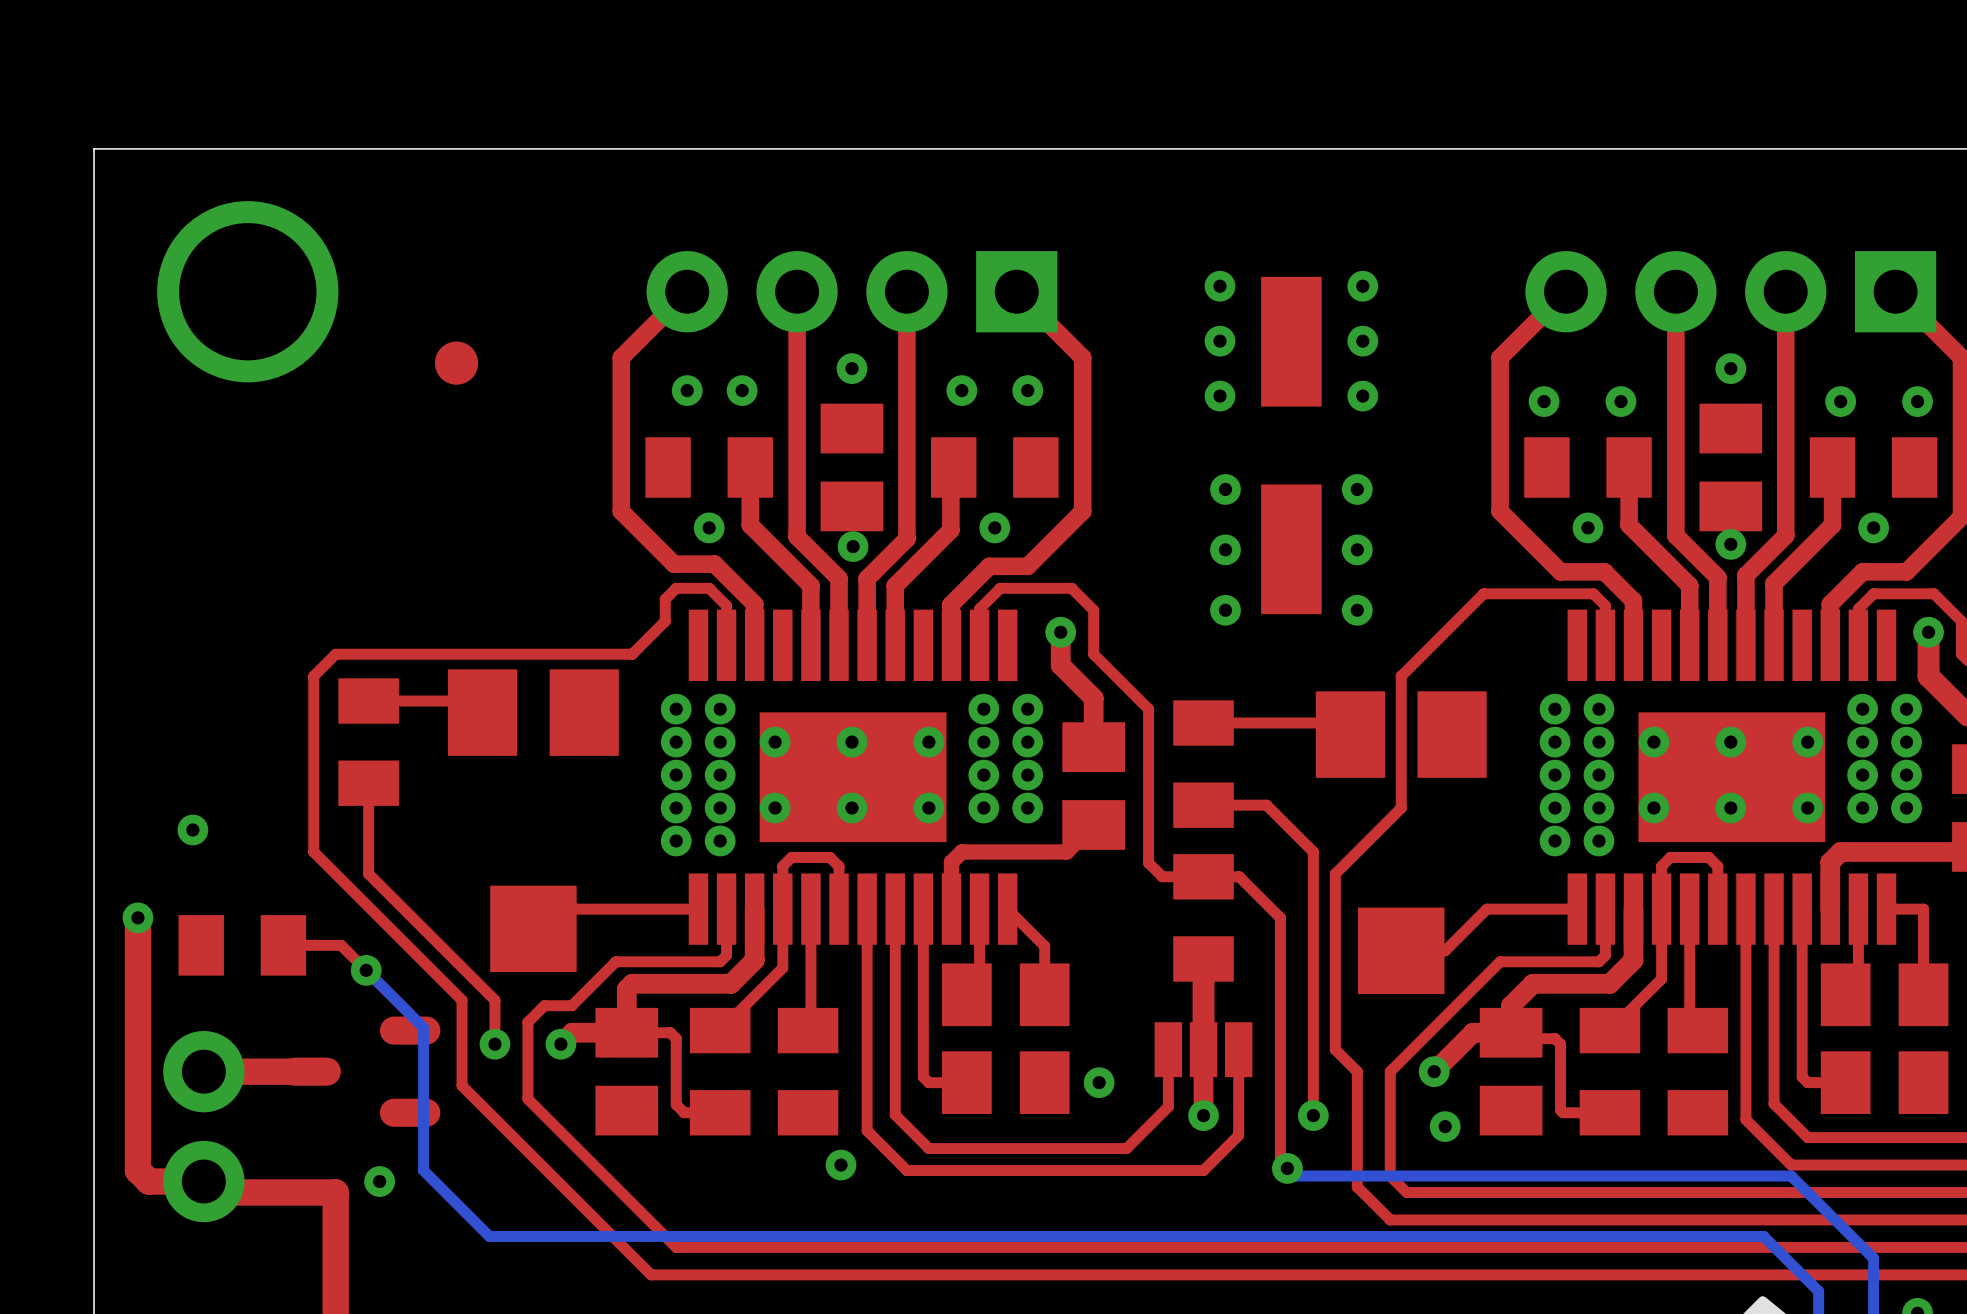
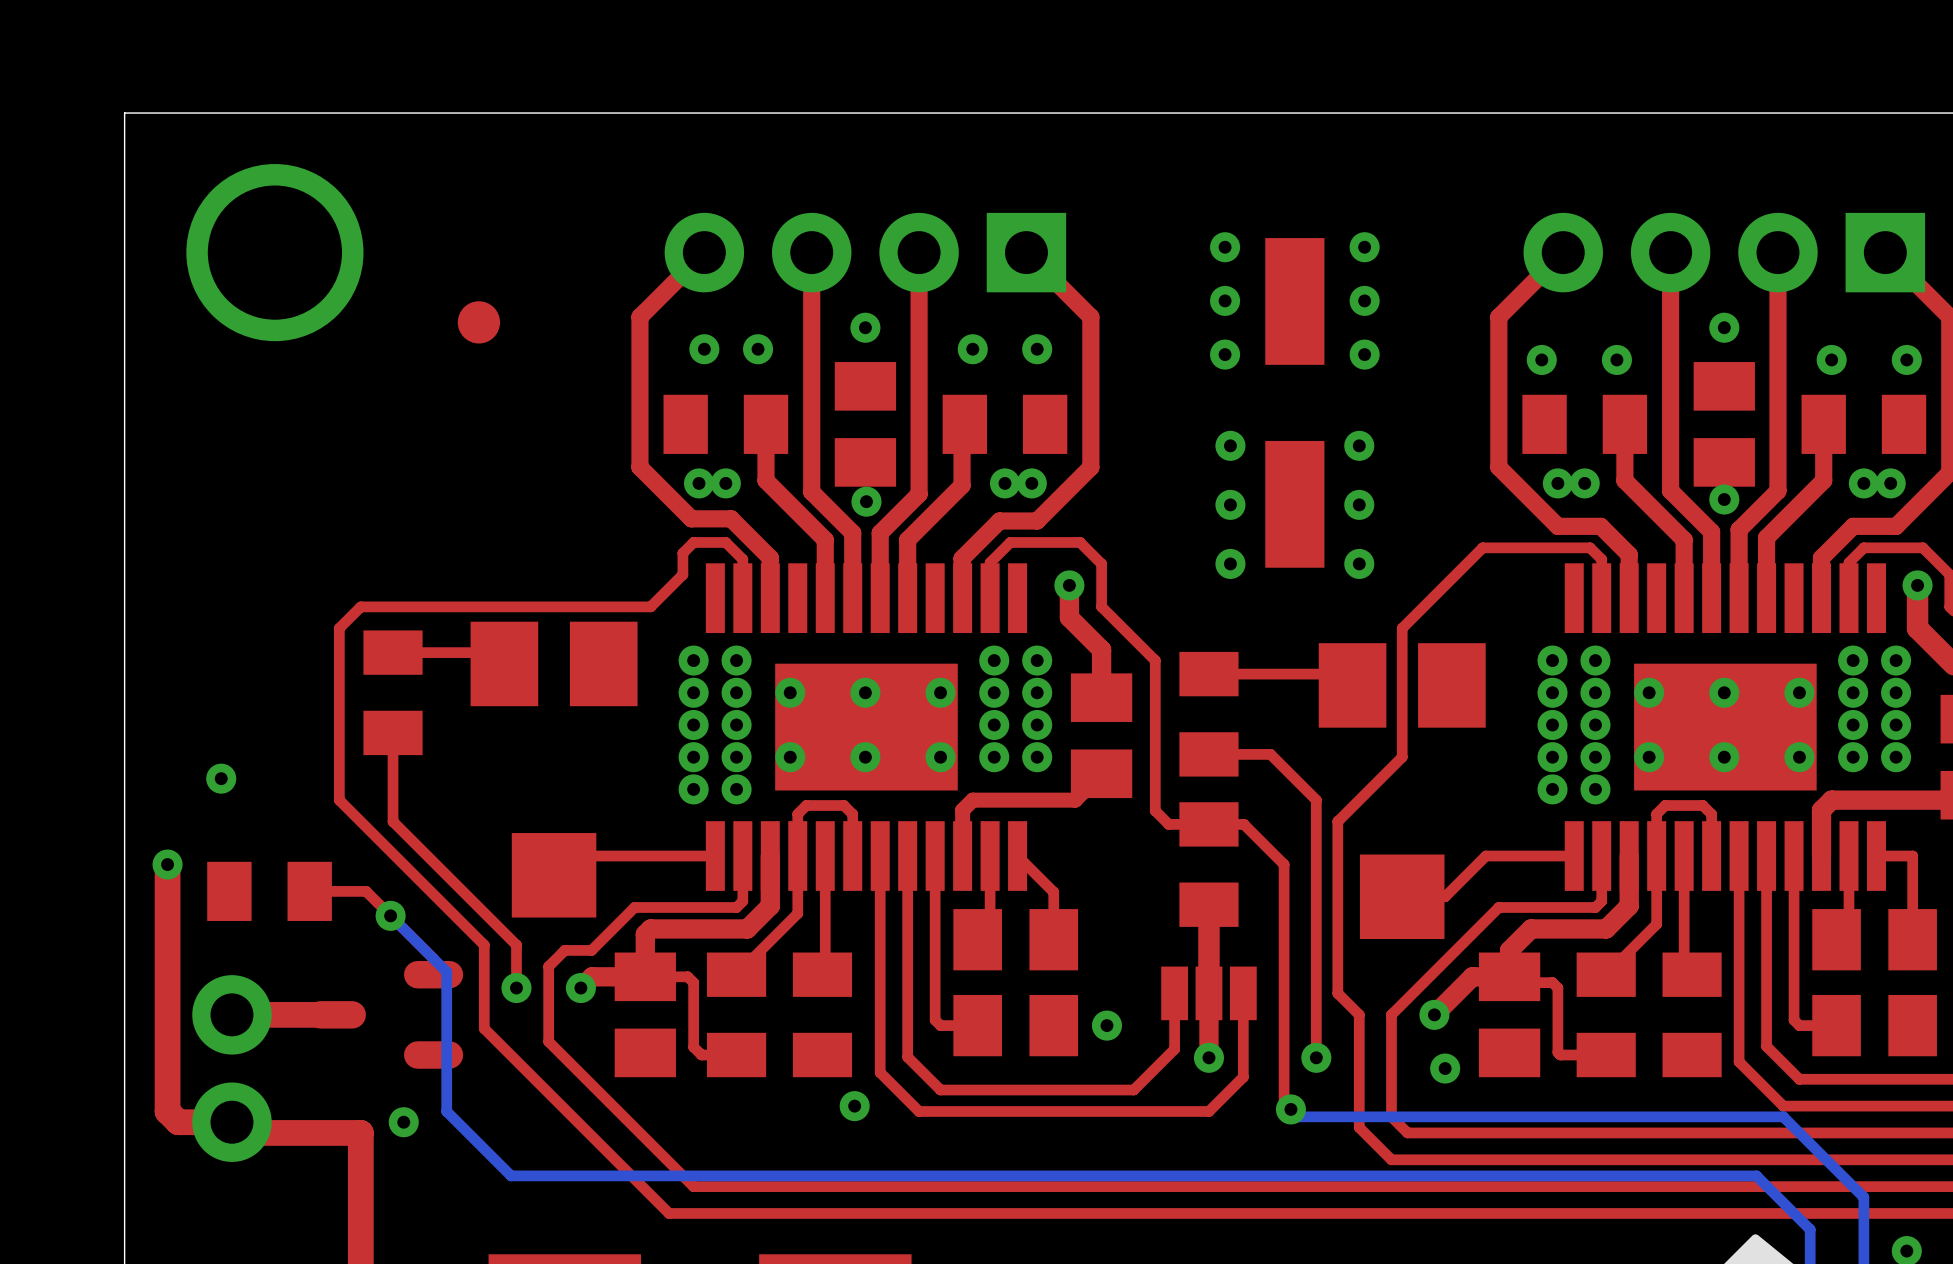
via: none -> (699, 483)
via: none -> (1031, 483)
via: none -> (1557, 483)
via: none -> (1890, 483)

